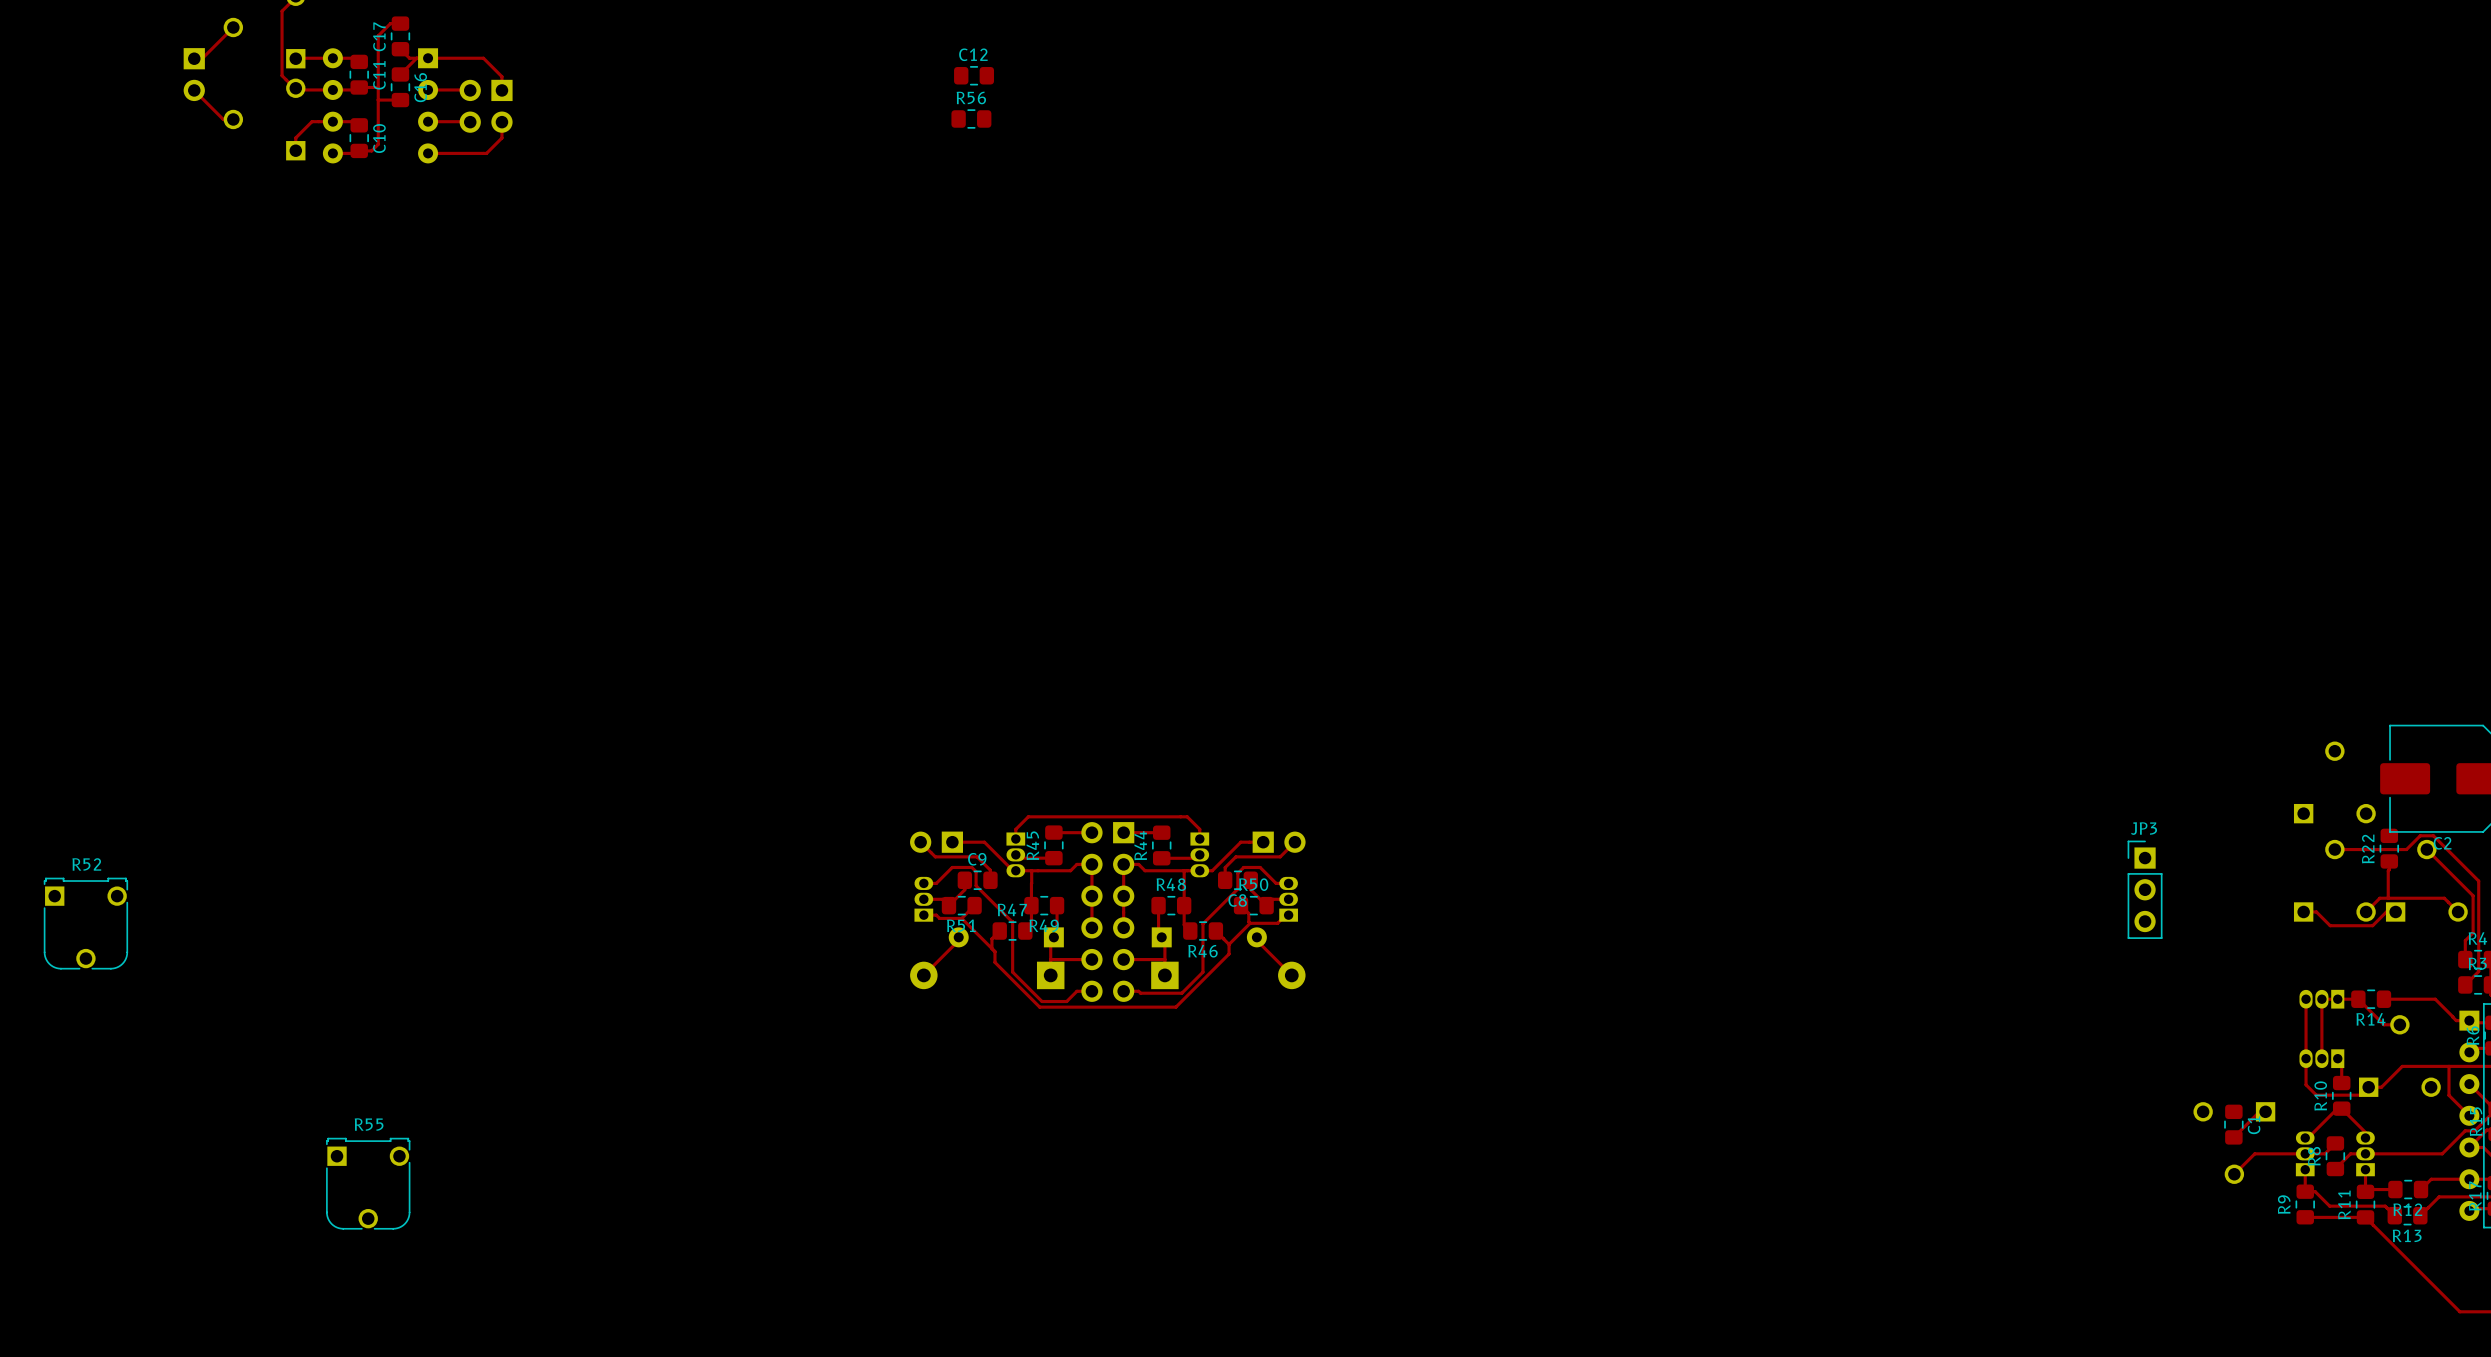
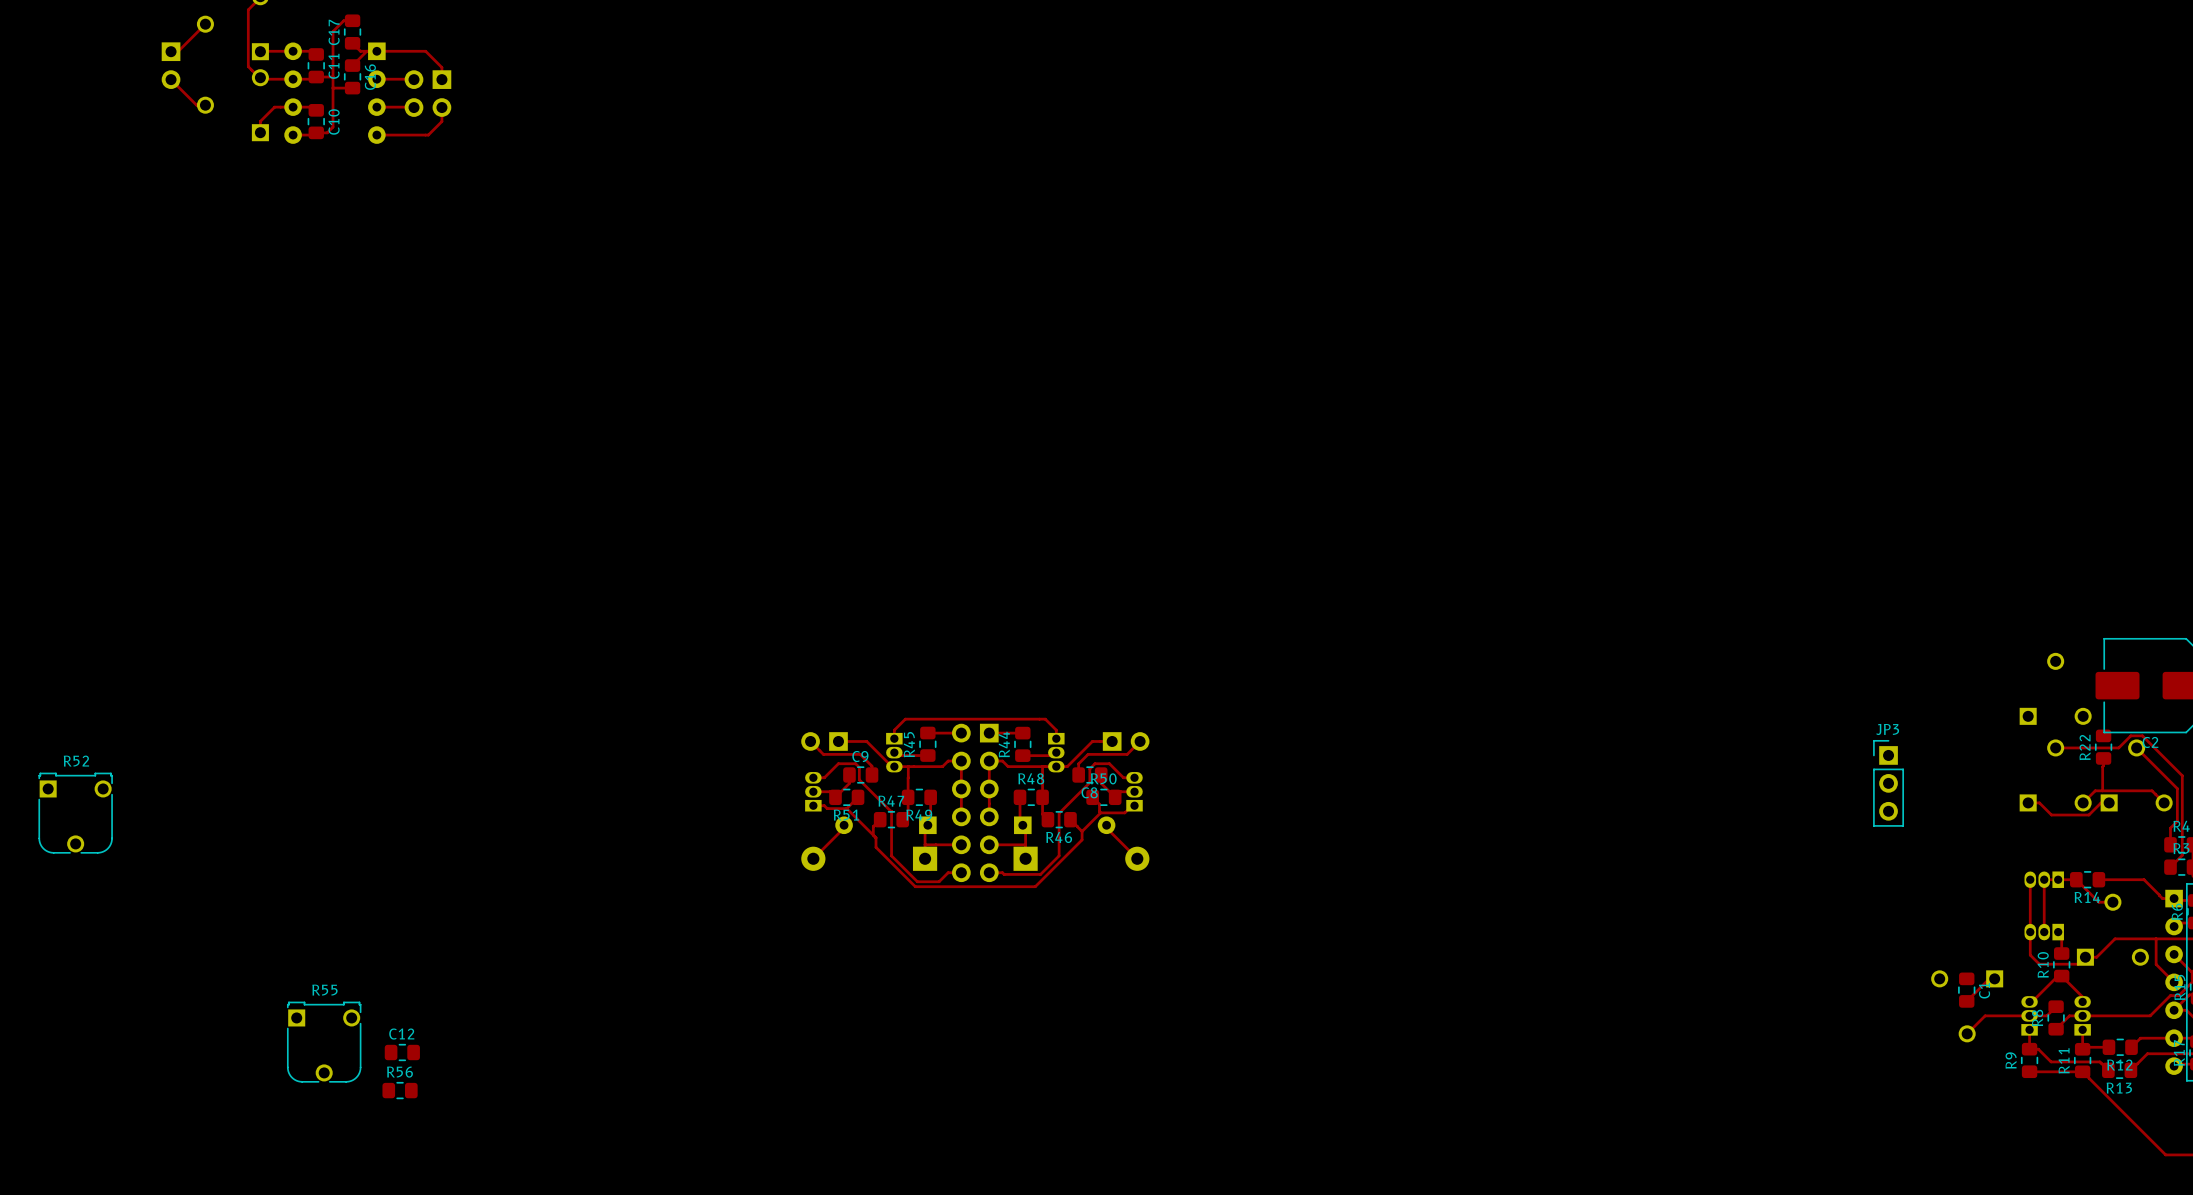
C12 position: (974, 75) -> (402, 1052)
R56 position: (971, 118) -> (400, 1090)

